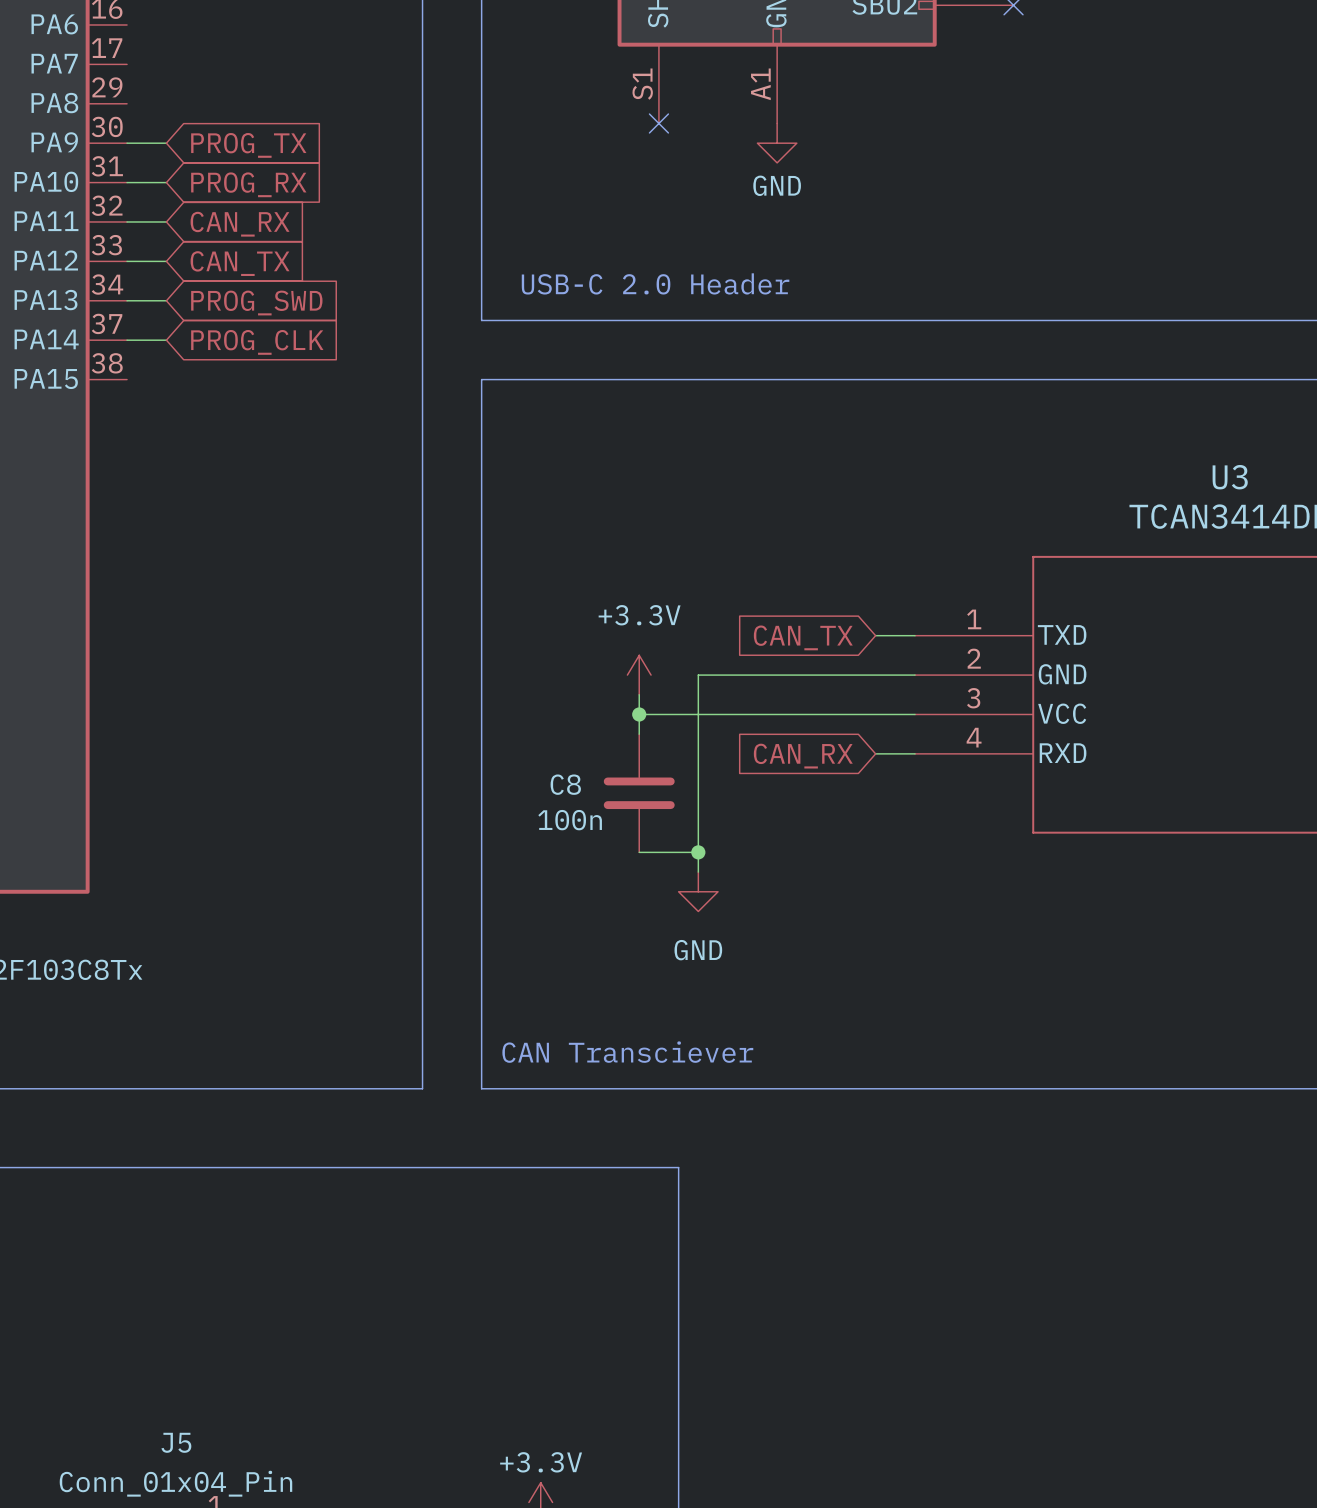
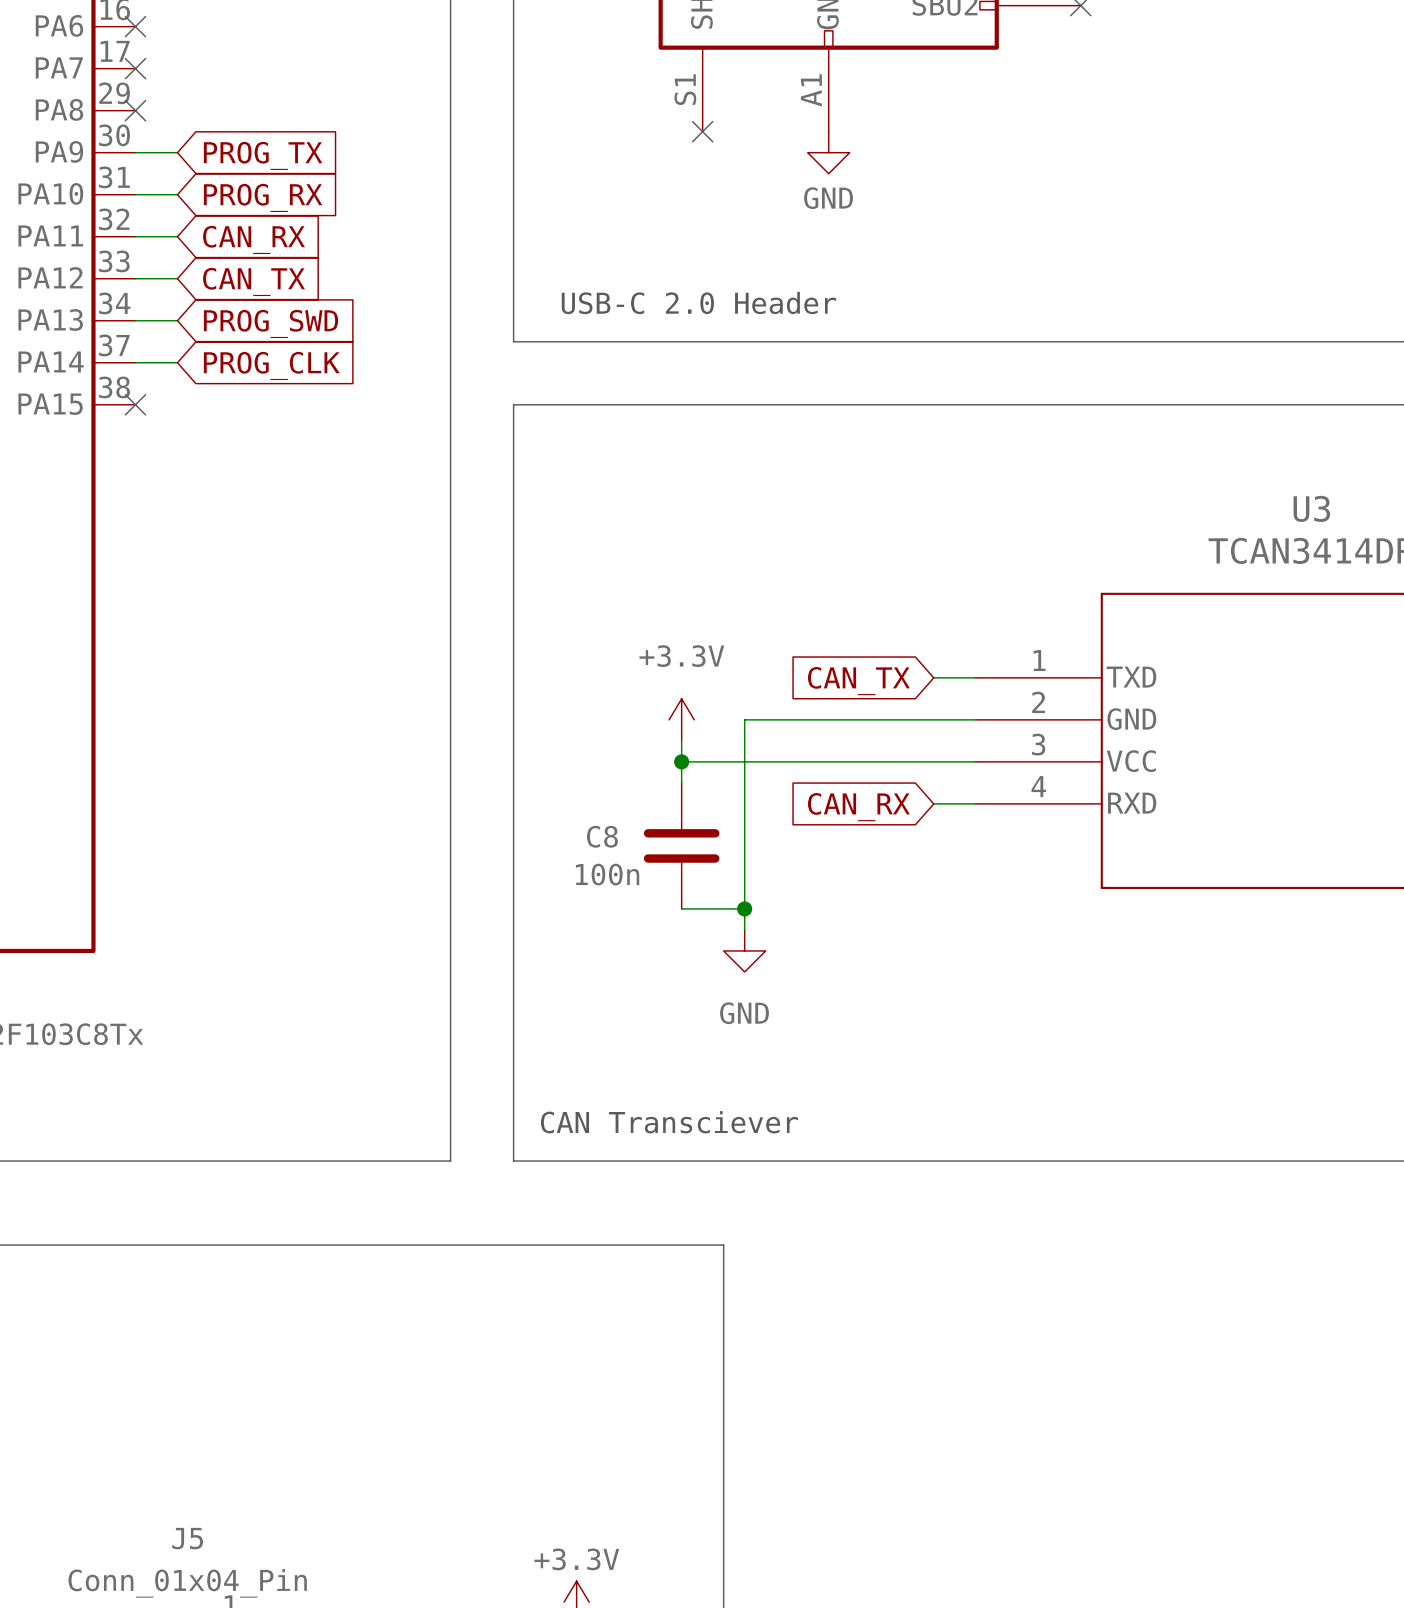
no-connect mark: none -> (135, 26)
no-connect mark: none -> (135, 68)
no-connect mark: none -> (135, 110)
no-connect mark: none -> (135, 404)

